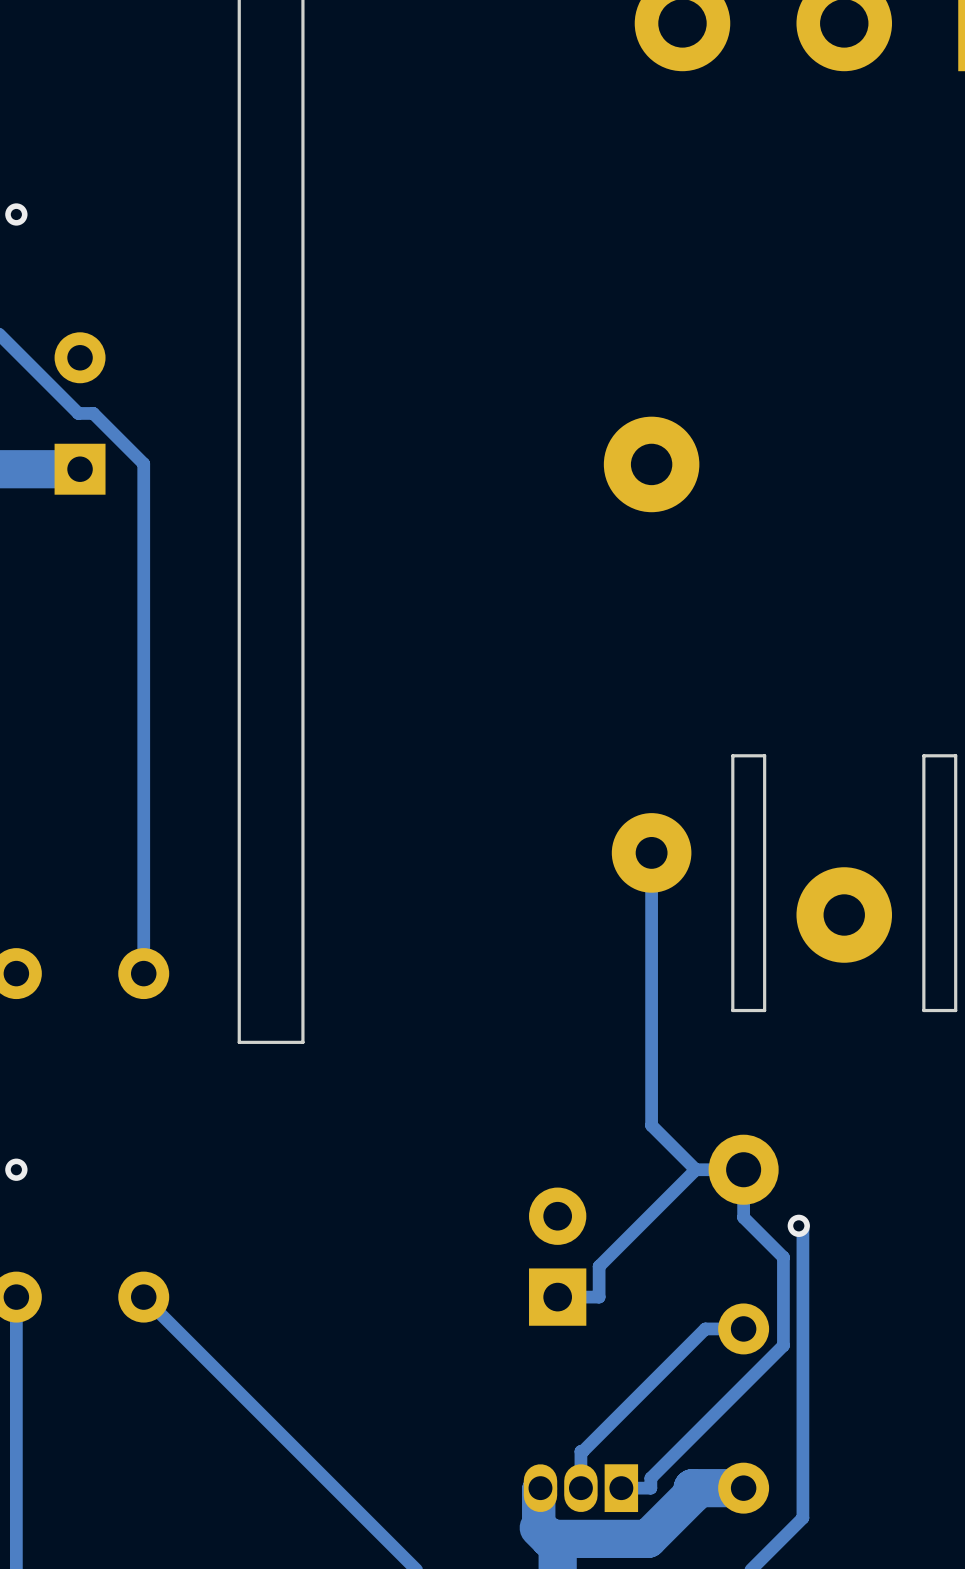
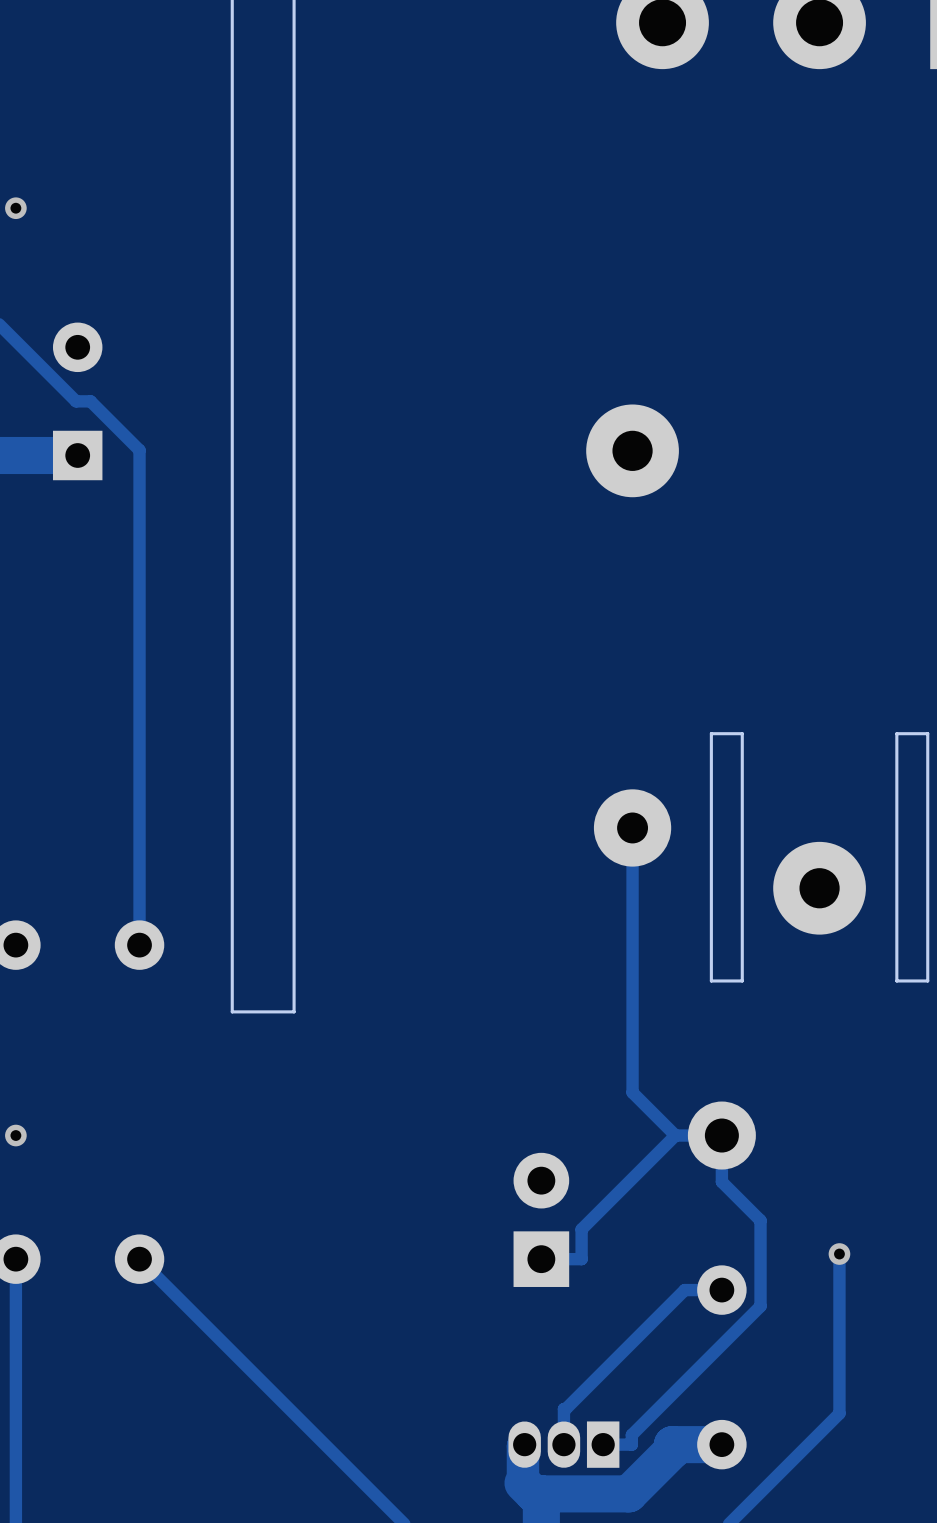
track: (798, 1225) (802, 1229) (802, 1517) -> (839, 1254) (839, 1413) (779, 1473)
via position: (798, 1225) -> (839, 1254)

